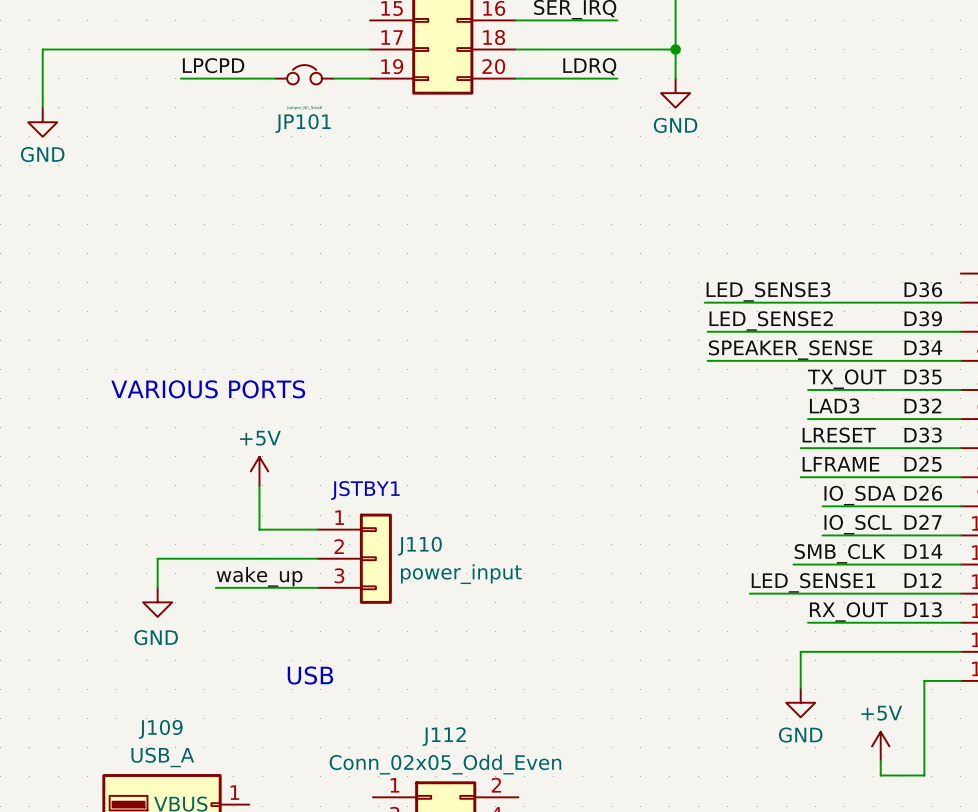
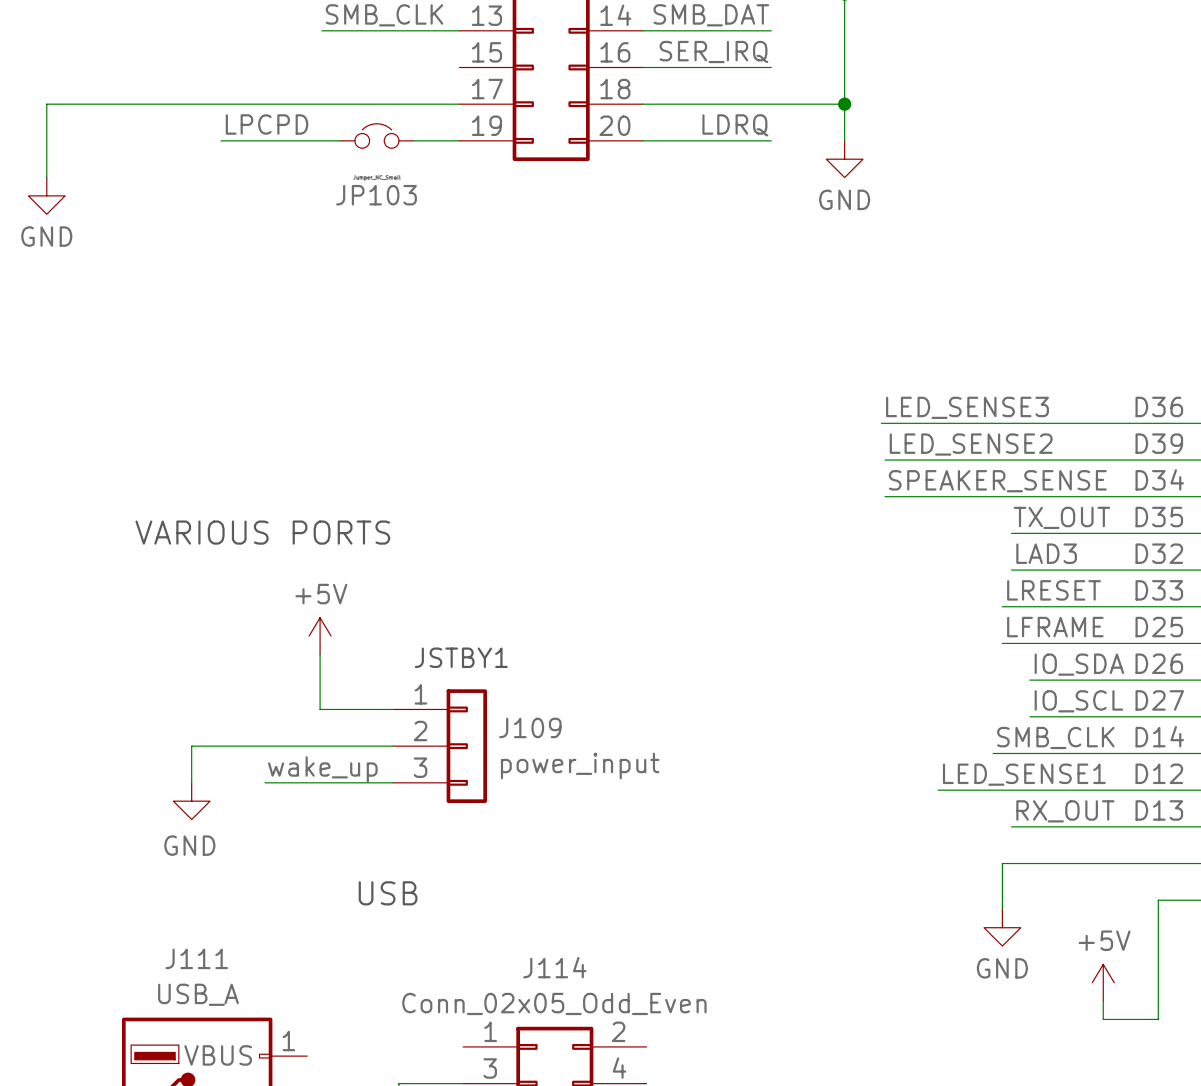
JP101 name: JP101 (303, 123) -> JP103 (376, 195)
J110 name: J110 (419, 546) -> J109 (530, 727)
J109 name: J109 (160, 729) -> J111 (196, 958)
J112 name: J112 (444, 736) -> J114 (554, 967)

